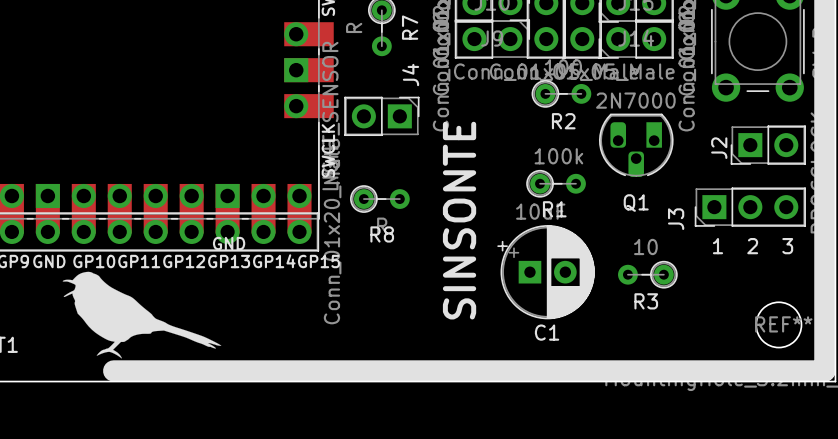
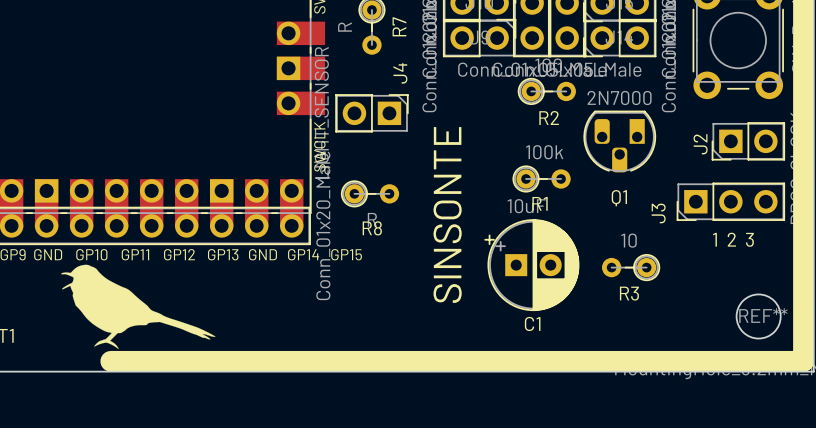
part text position: GND (229, 243) -> GND (262, 254)
part text position: GP14 (274, 261) -> GP14 (303, 254)
part text position: GP15 (318, 261) -> GP15 (346, 254)

